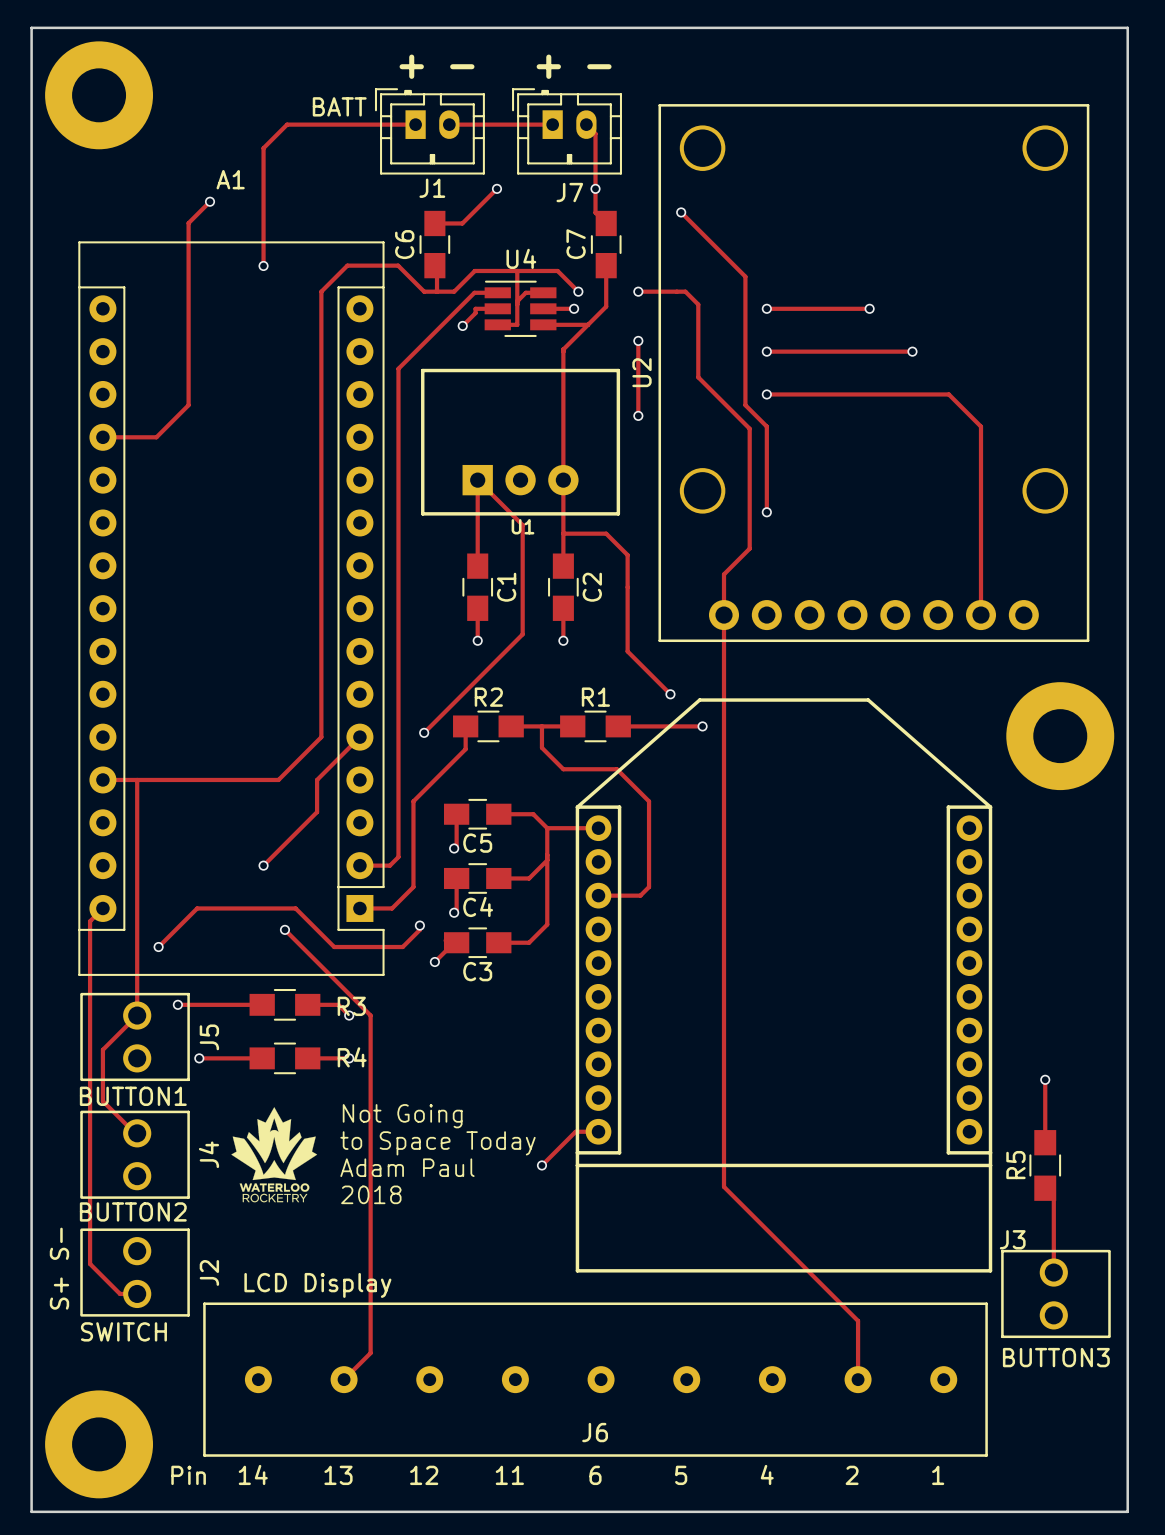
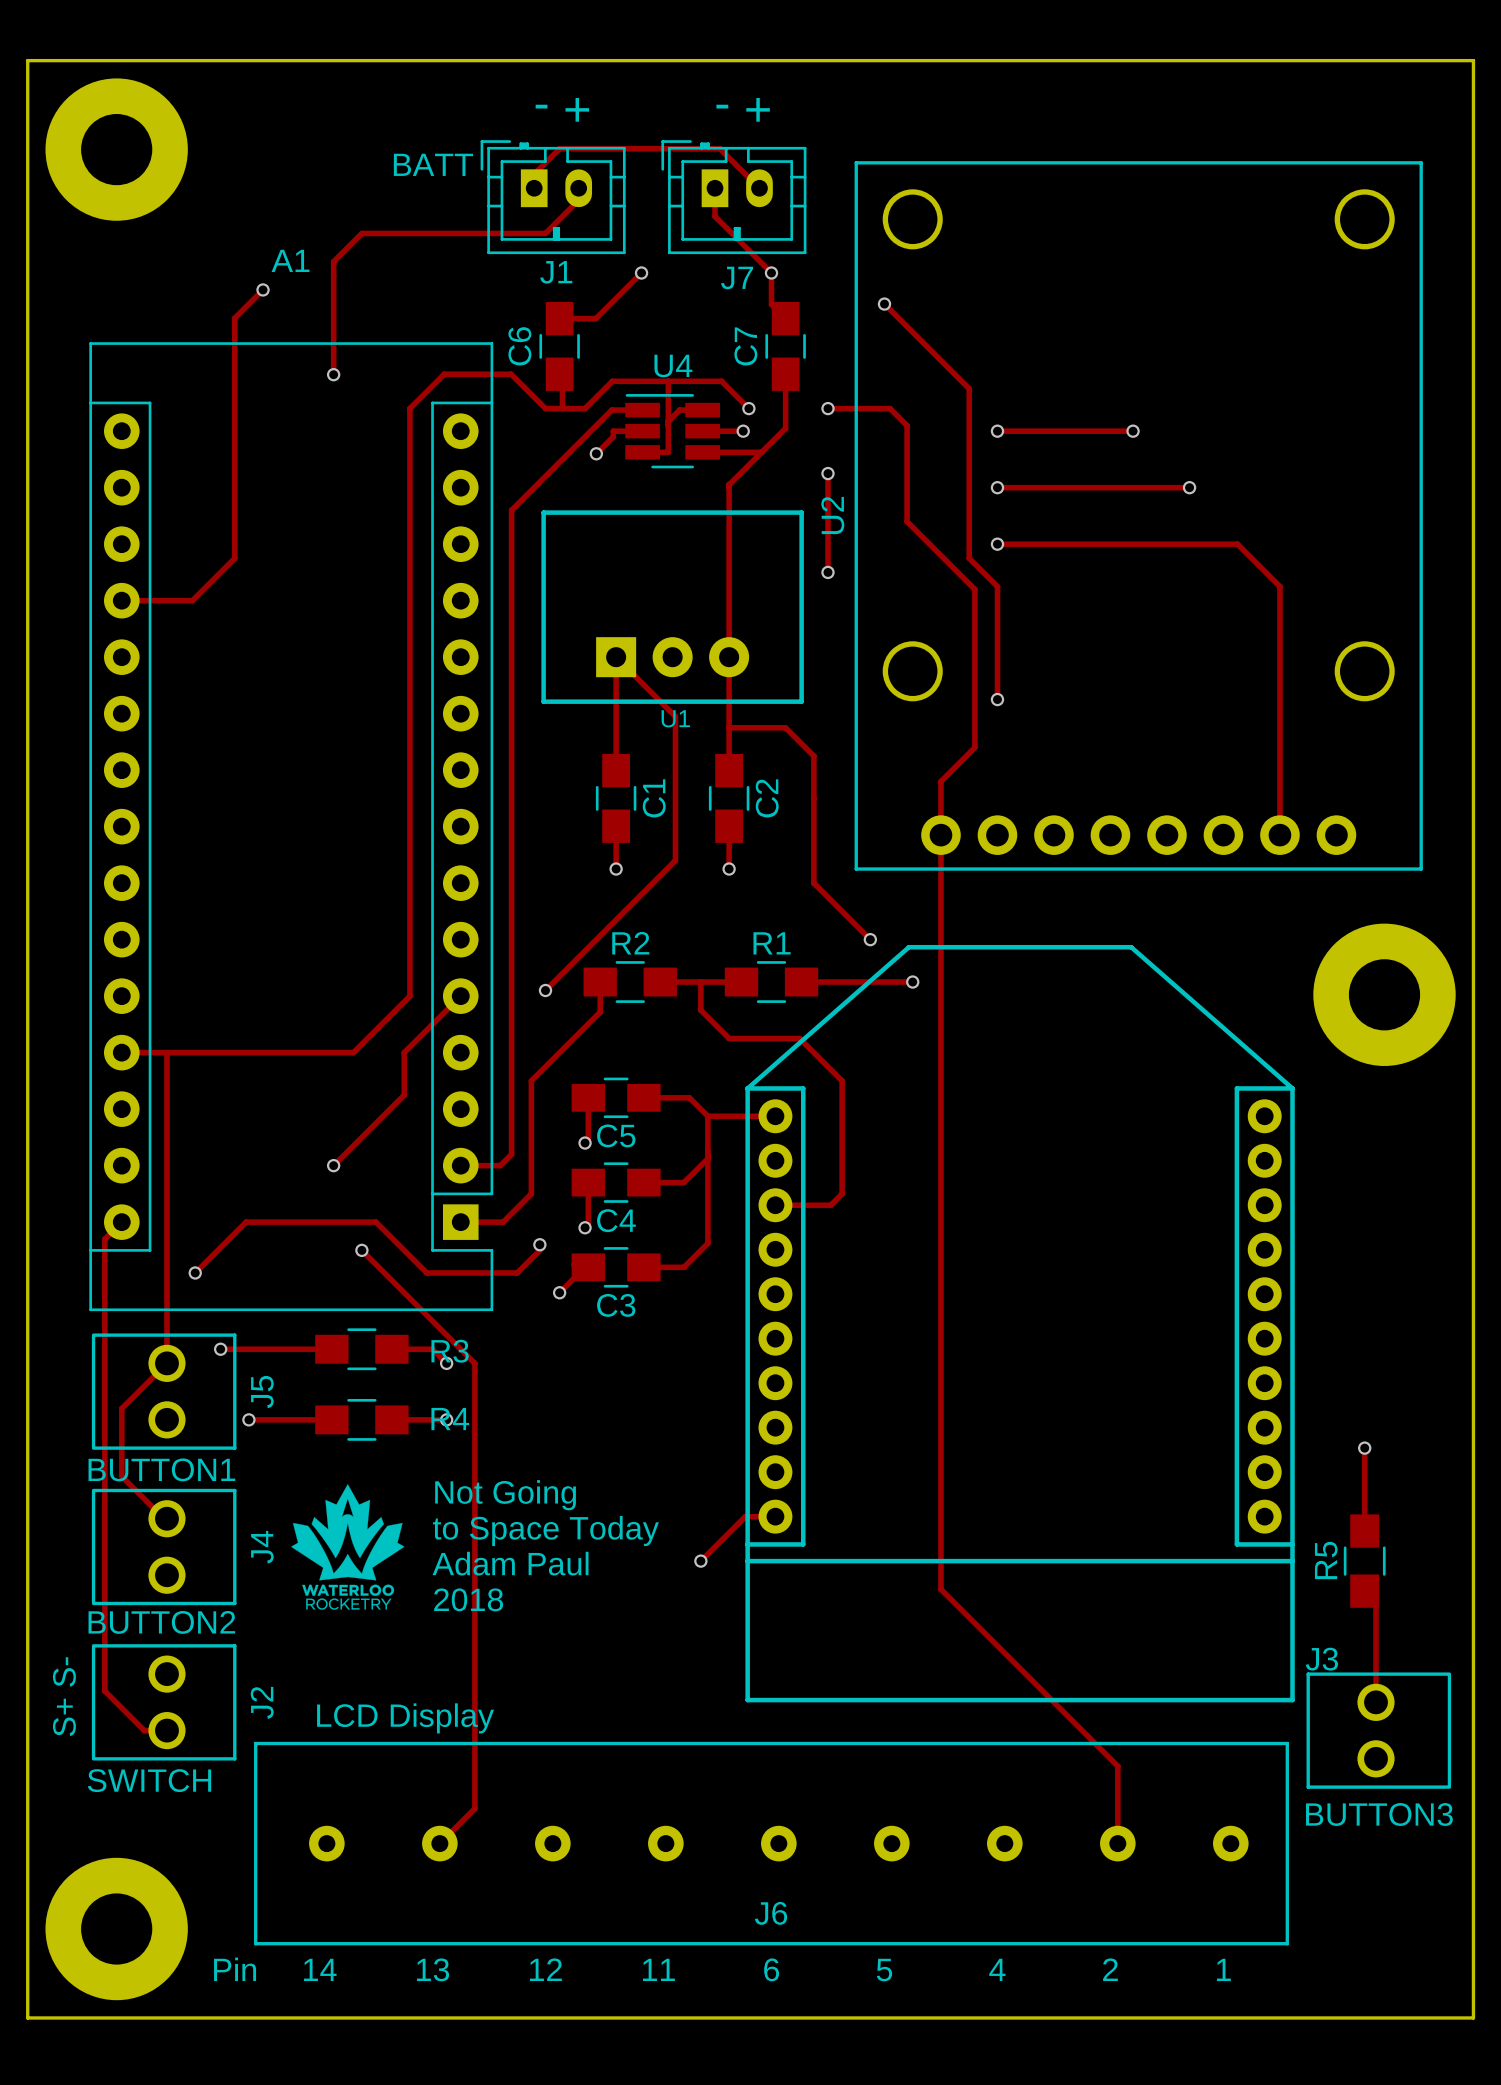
text rotation: 0° (437, 66) -> 180° (562, 109)
text rotation: 0° (574, 66) -> 180° (743, 109)
track: (415, 124) (287, 124) (263, 148) (263, 180) -> (578, 188) (578, 200) (545, 233) (361, 233) (333, 261)
track: none -> (534, 188) (534, 174) (559, 148) (719, 148) (759, 188)
track: (449, 124) (552, 124) -> none
track: (586, 124) (595, 133) (595, 188) -> (715, 188) (715, 216) (771, 273)

